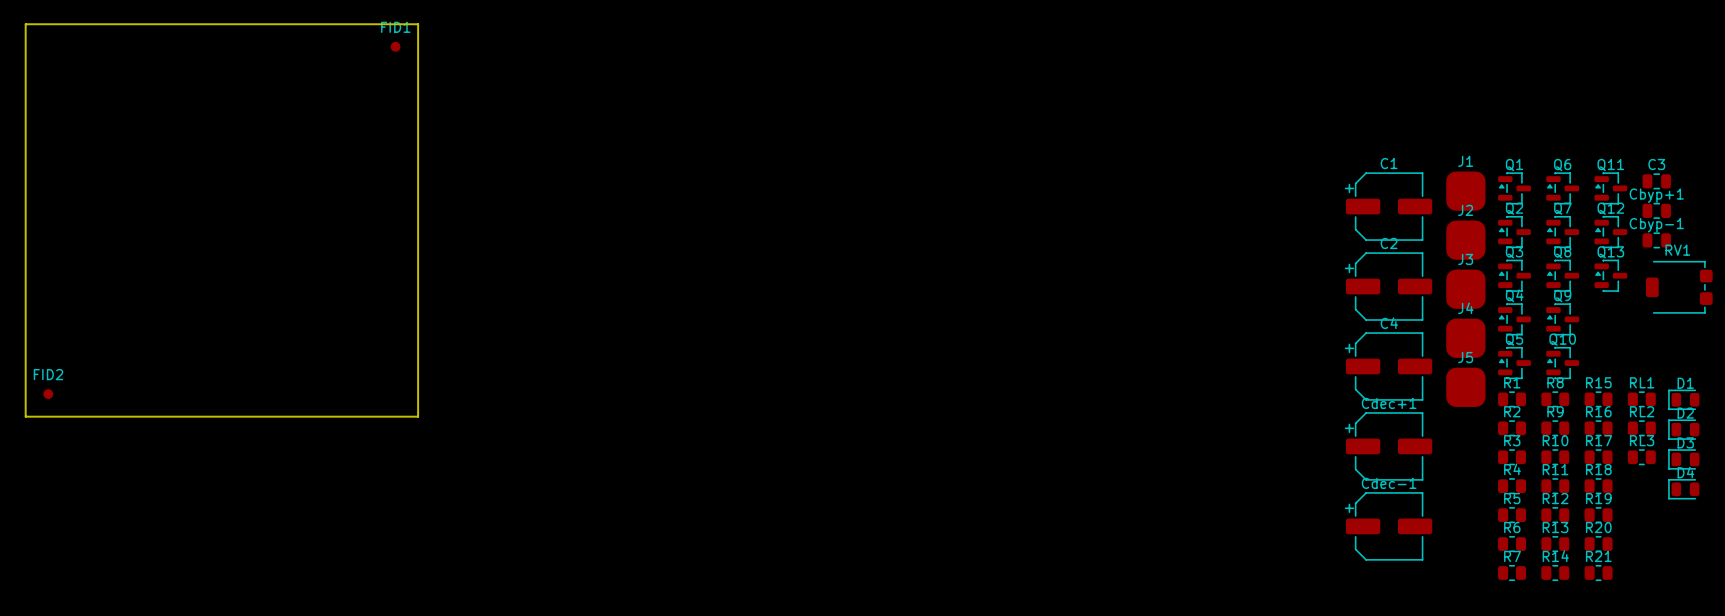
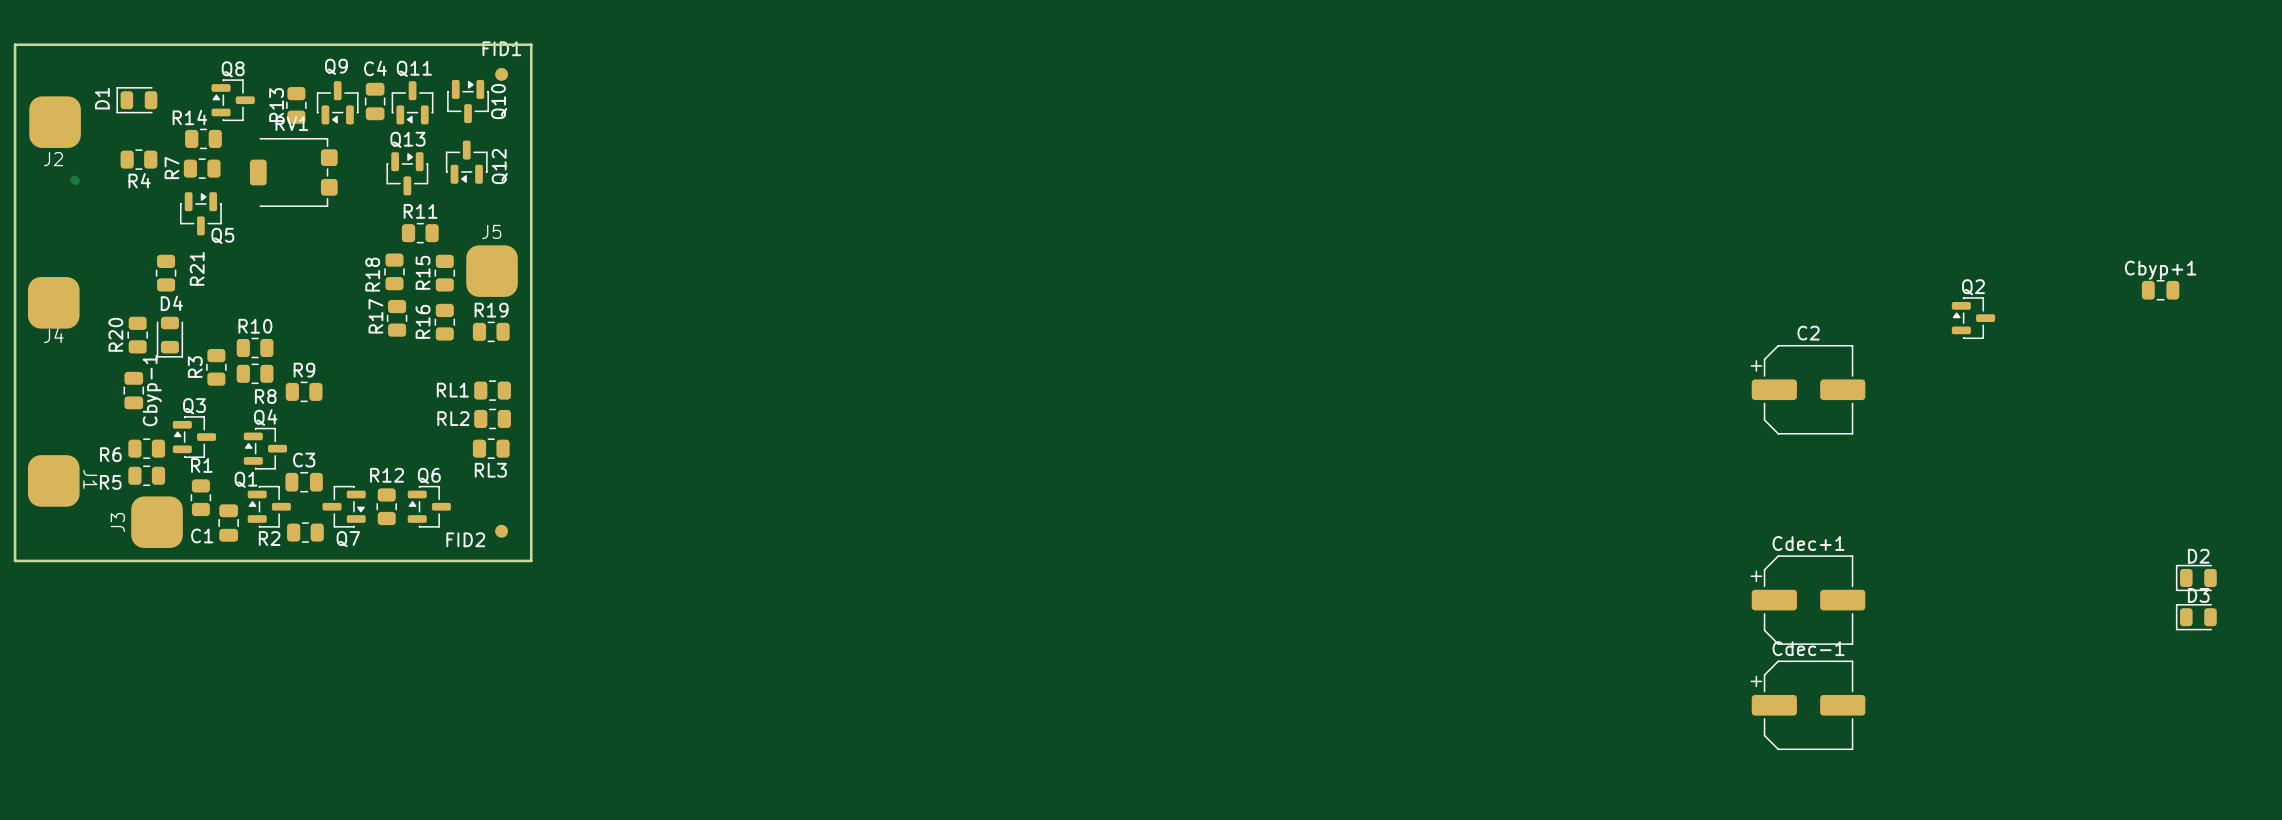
track: none -> (74, 179) (75, 180)
J1 name rotation: 0° (1465, 161) -> 90° clockwise (90, 479)
J1 name position: J1 (1465, 161) -> J1 (90, 479)
C1 name position: C1 (1389, 163) -> C1 (202, 535)
Q1 name position: Q1 (1514, 164) -> Q1 (246, 479)
C1 footprint: [1344, 172, 1433, 241] -> [218, 504, 239, 542]
C3 position: (1656, 181) -> (304, 482)
Q1 position: (1514, 188) -> (269, 506)
Q6 position: (1562, 188) -> (429, 506)
Q11 rotation: 0° (1610, 188) -> 90° counterclockwise (412, 102)
Q11 position: (1610, 188) -> (412, 102)
J1 position: (1465, 191) -> (53, 480)
Q12 name position: Q12 (1610, 208) -> Q12 (499, 166)
J2 name position: J2 (1465, 210) -> J2 (53, 159)
Q7 rotation: 0° (1562, 232) -> 180° (344, 506)
Q7 position: (1562, 232) -> (344, 506)
Q12 rotation: 0° (1610, 232) -> 90° counterclockwise (466, 162)
Q12 position: (1610, 232) -> (466, 162)
J2 position: (1465, 240) -> (55, 122)
Cbyp-1 rotation: 0° (1656, 240) -> 90° clockwise (133, 390)
Cbyp-1 position: (1656, 240) -> (133, 390)
J3 name rotation: 0° (1465, 259) -> 90° counterclockwise (117, 522)
J3 name position: J3 (1465, 259) -> J3 (117, 522)
Q3 position: (1514, 275) -> (194, 437)
Q8 position: (1562, 275) -> (233, 100)
Q13 rotation: 0° (1610, 275) -> 90° clockwise (407, 173)
Q13 position: (1610, 275) -> (407, 173)
RV1 position: (1679, 287) -> (293, 172)
J3 position: (1465, 289) -> (157, 522)
J4 name position: J4 (1465, 308) -> J4 (53, 335)
Q4 position: (1514, 319) -> (265, 448)
Q9 rotation: 0° (1562, 319) -> 90° counterclockwise (337, 102)
Q9 position: (1562, 319) -> (337, 102)
C4 footprint: [1344, 332, 1433, 401] -> [364, 82, 386, 121]
J4 position: (1465, 338) -> (53, 302)
Q5 rotation: 0° (1514, 363) -> 90° clockwise (200, 213)
Q5 position: (1514, 363) -> (200, 213)
Q10 rotation: 0° (1562, 363) -> 90° clockwise (468, 101)
Q10 position: (1562, 363) -> (468, 101)
FID2 name position: FID2 (48, 374) -> FID2 (465, 539)
R8 name position: R8 (1555, 382) -> R8 (265, 396)
R15 name position: R15 (1598, 382) -> R15 (423, 272)
RL1 name position: RL1 (1642, 382) -> RL1 (452, 390)
D1 name rotation: 0° (1685, 383) -> 90° counterclockwise (102, 98)
D1 name position: D1 (1685, 383) -> D1 (102, 98)
J5 position: (1465, 387) -> (492, 271)
FID2 position: (48, 394) -> (501, 531)
R1 rotation: 0° (1512, 399) -> 90° clockwise (200, 497)
R1 position: (1512, 399) -> (200, 497)
R8 position: (1555, 399) -> (255, 373)
R15 rotation: 0° (1598, 399) -> 90° clockwise (444, 273)
R15 position: (1598, 399) -> (444, 273)
RL1 position: (1641, 399) -> (492, 390)
D1 position: (1683, 399) -> (136, 100)
R2 name position: R2 (1512, 411) -> R2 (269, 538)
R16 name position: R16 (1598, 411) -> R16 (423, 321)
RL2 name position: RL2 (1642, 411) -> RL2 (453, 418)
R2 position: (1512, 428) -> (305, 532)
R9 position: (1555, 428) -> (304, 391)
R16 rotation: 0° (1598, 428) -> 90° clockwise (444, 322)
R16 position: (1598, 428) -> (444, 322)
RL2 position: (1641, 428) -> (492, 418)
R3 name position: R3 (1512, 440) -> R3 (195, 367)
R17 name position: R17 (1599, 440) -> R17 (375, 316)
RL3 name position: RL3 (1642, 440) -> RL3 (490, 470)
R3 rotation: 0° (1512, 457) -> 90° clockwise (216, 367)
R3 position: (1512, 457) -> (216, 367)
R10 position: (1555, 457) -> (255, 348)
R17 rotation: 0° (1598, 457) -> 90° clockwise (397, 318)
R17 position: (1598, 457) -> (397, 318)
RL3 position: (1641, 457) -> (491, 448)
R4 name position: R4 (1512, 469) -> R4 (139, 180)
R18 name position: R18 (1598, 469) -> R18 (372, 274)
R4 position: (1512, 486) -> (138, 159)
R11 position: (1555, 486) -> (420, 233)
R18 rotation: 0° (1598, 486) -> 90° clockwise (394, 271)
R18 position: (1598, 486) -> (394, 271)
D4 rotation: 0° (1683, 489) -> 90° counterclockwise (169, 337)
D4 position: (1683, 489) -> (169, 337)
R5 name position: R5 (1512, 498) -> R5 (110, 482)
R5 position: (1512, 515) -> (146, 475)
R12 rotation: 0° (1555, 515) -> 90° clockwise (386, 506)
R12 position: (1555, 515) -> (386, 506)
R19 position: (1598, 515) -> (491, 331)
R6 name position: R6 (1512, 527) -> R6 (110, 454)
R13 name position: R13 (1555, 527) -> R13 (276, 105)
R20 name position: R20 (1598, 527) -> R20 (115, 334)
R6 position: (1512, 544) -> (146, 448)
R13 rotation: 0° (1555, 544) -> 90° clockwise (296, 105)
R13 position: (1555, 544) -> (296, 105)
R20 rotation: 0° (1598, 544) -> 90° clockwise (137, 335)
R20 position: (1598, 544) -> (137, 335)
R7 name rotation: 0° (1512, 556) -> 90° counterclockwise (172, 168)
R7 name position: R7 (1512, 556) -> R7 (172, 168)
R14 name position: R14 (1555, 556) -> R14 (189, 117)
R7 position: (1512, 573) -> (202, 168)
R14 position: (1555, 573) -> (203, 138)
R21 rotation: 0° (1598, 573) -> 90° clockwise (166, 273)
R21 position: (1598, 573) -> (166, 273)

